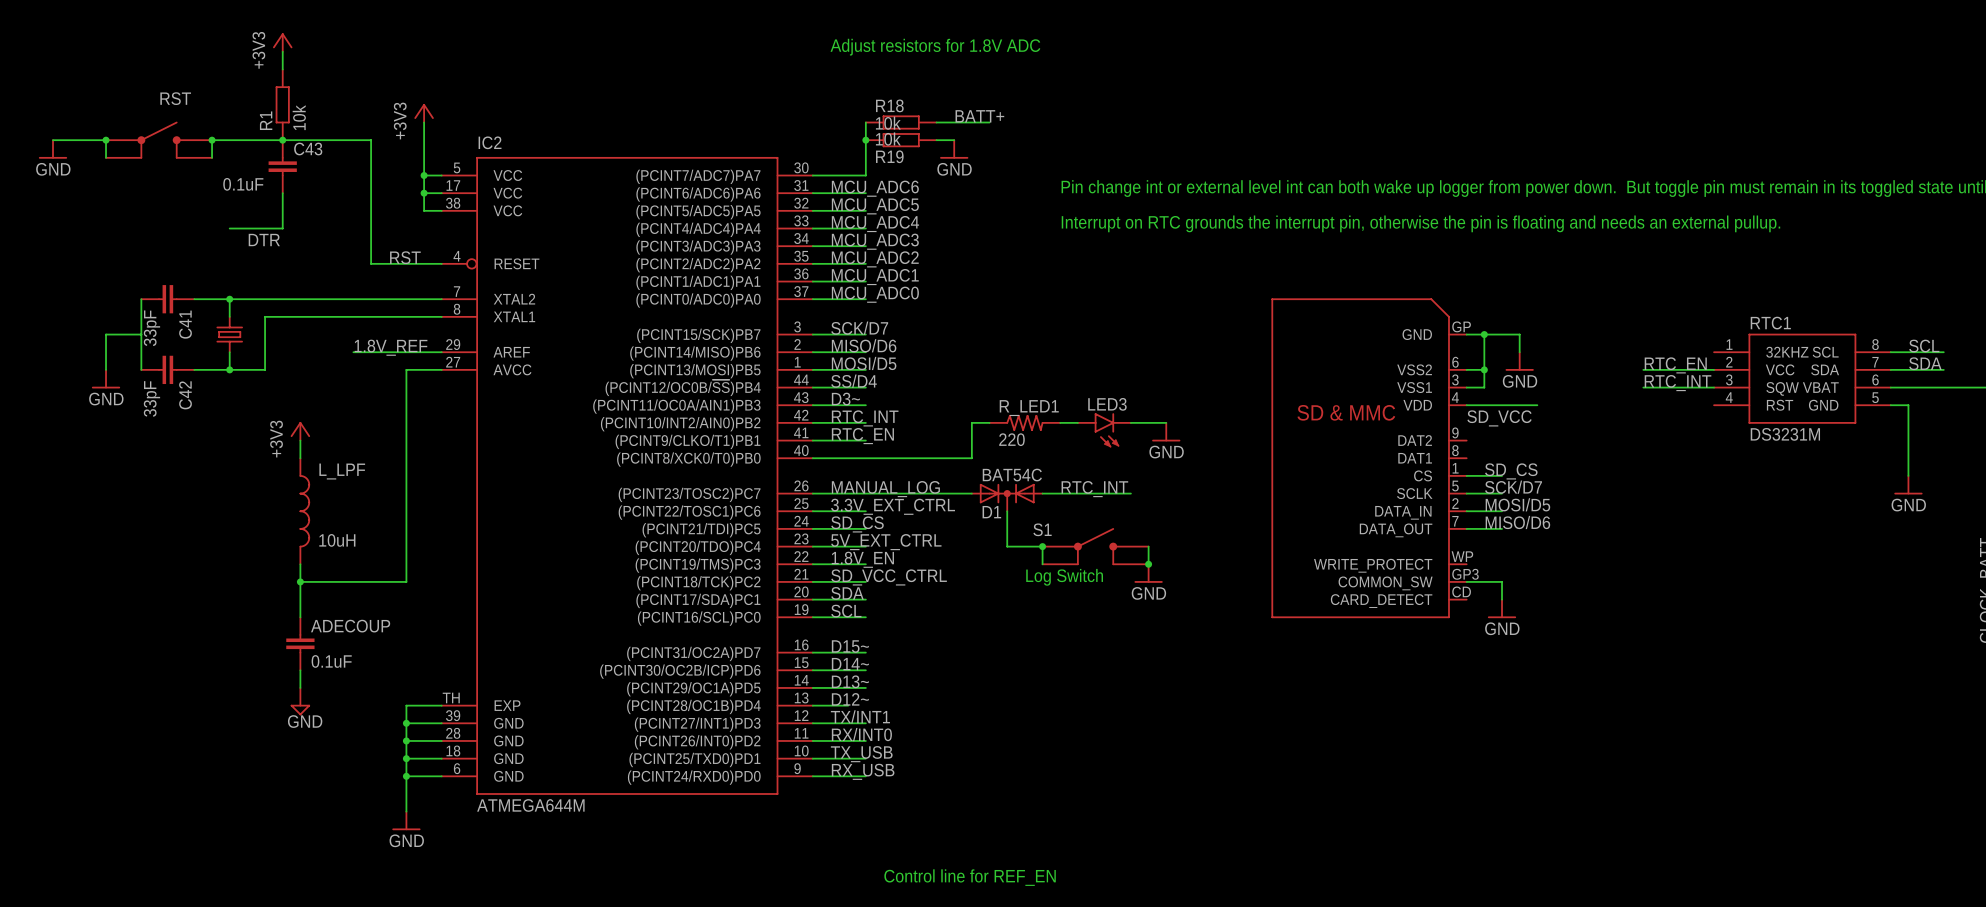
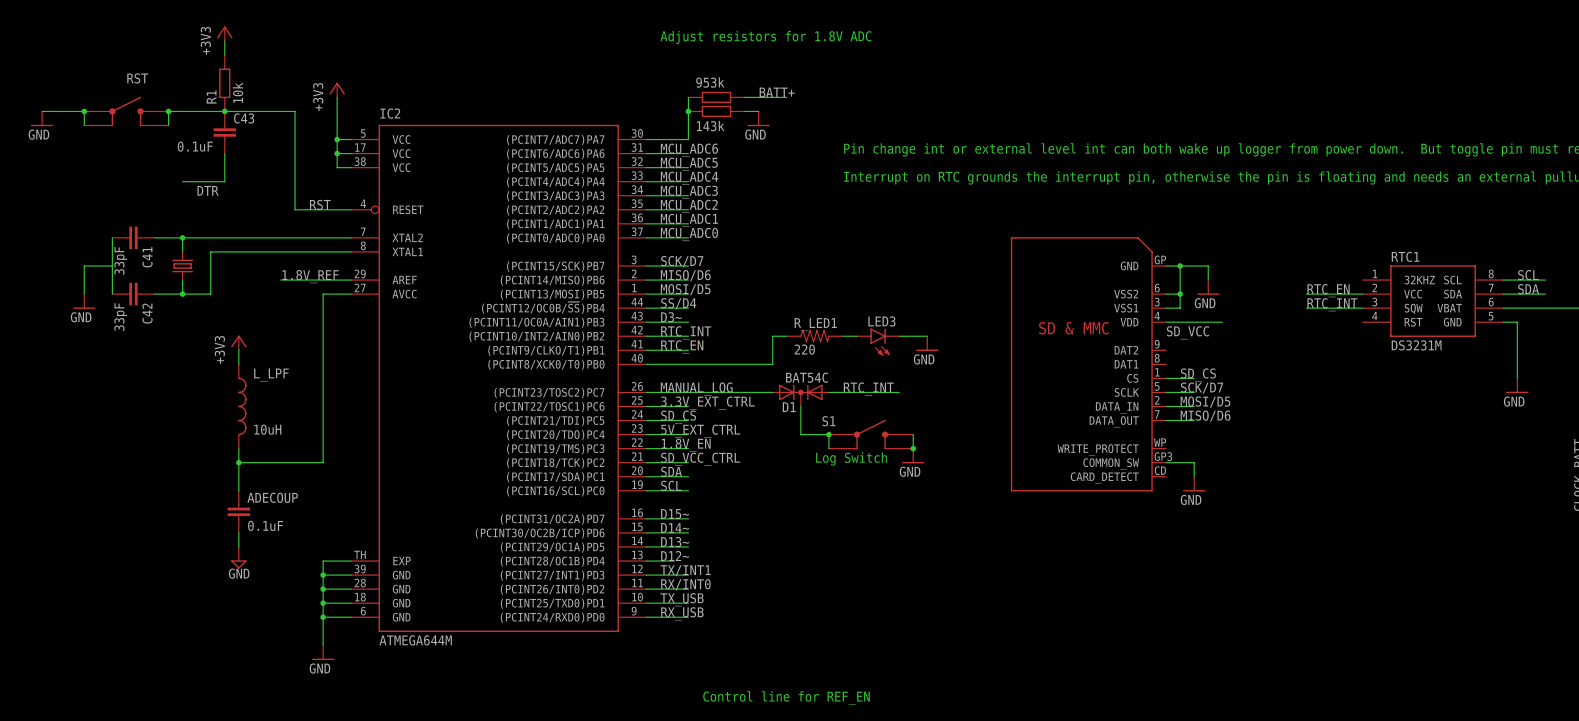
R18 name: R18 (889, 105) -> none
R19 value: 10k (888, 123) -> 143k (710, 126)
R18 value: 10k (888, 139) -> 953k (710, 82)
R19 name: R19 (889, 156) -> none

